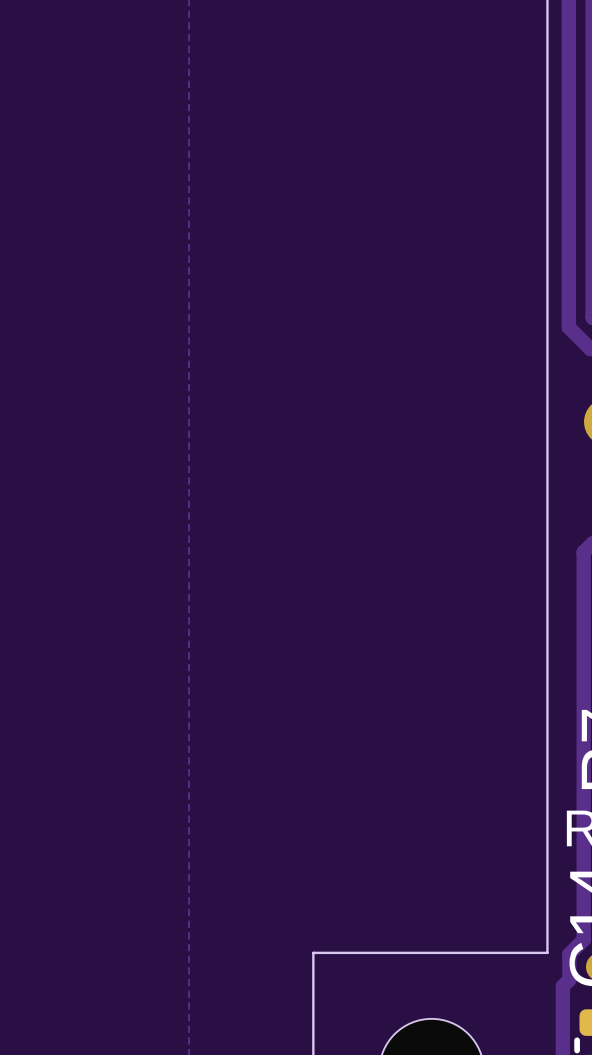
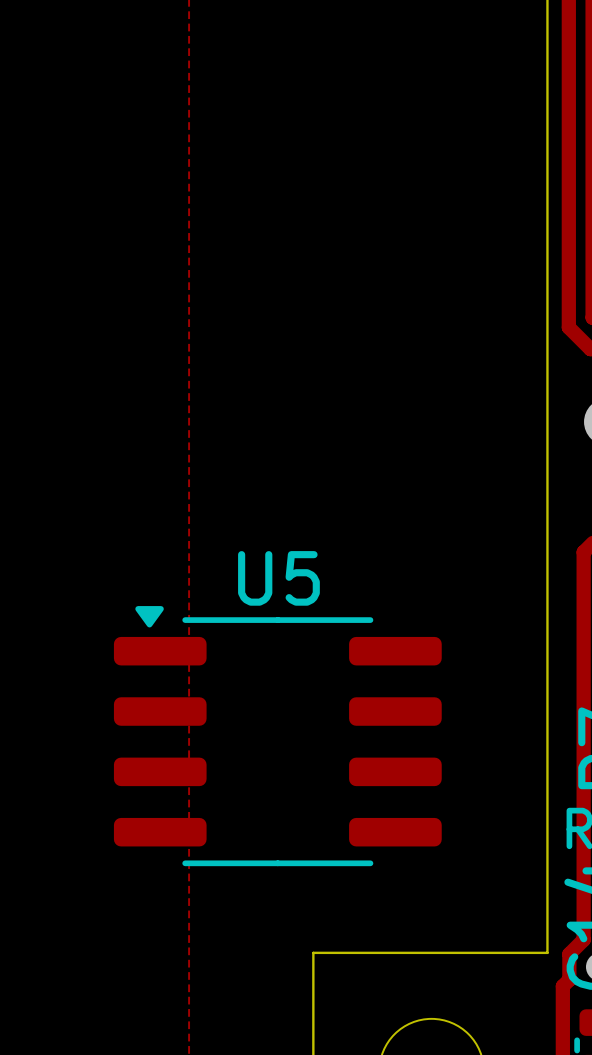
U5: none -> (277, 736)

